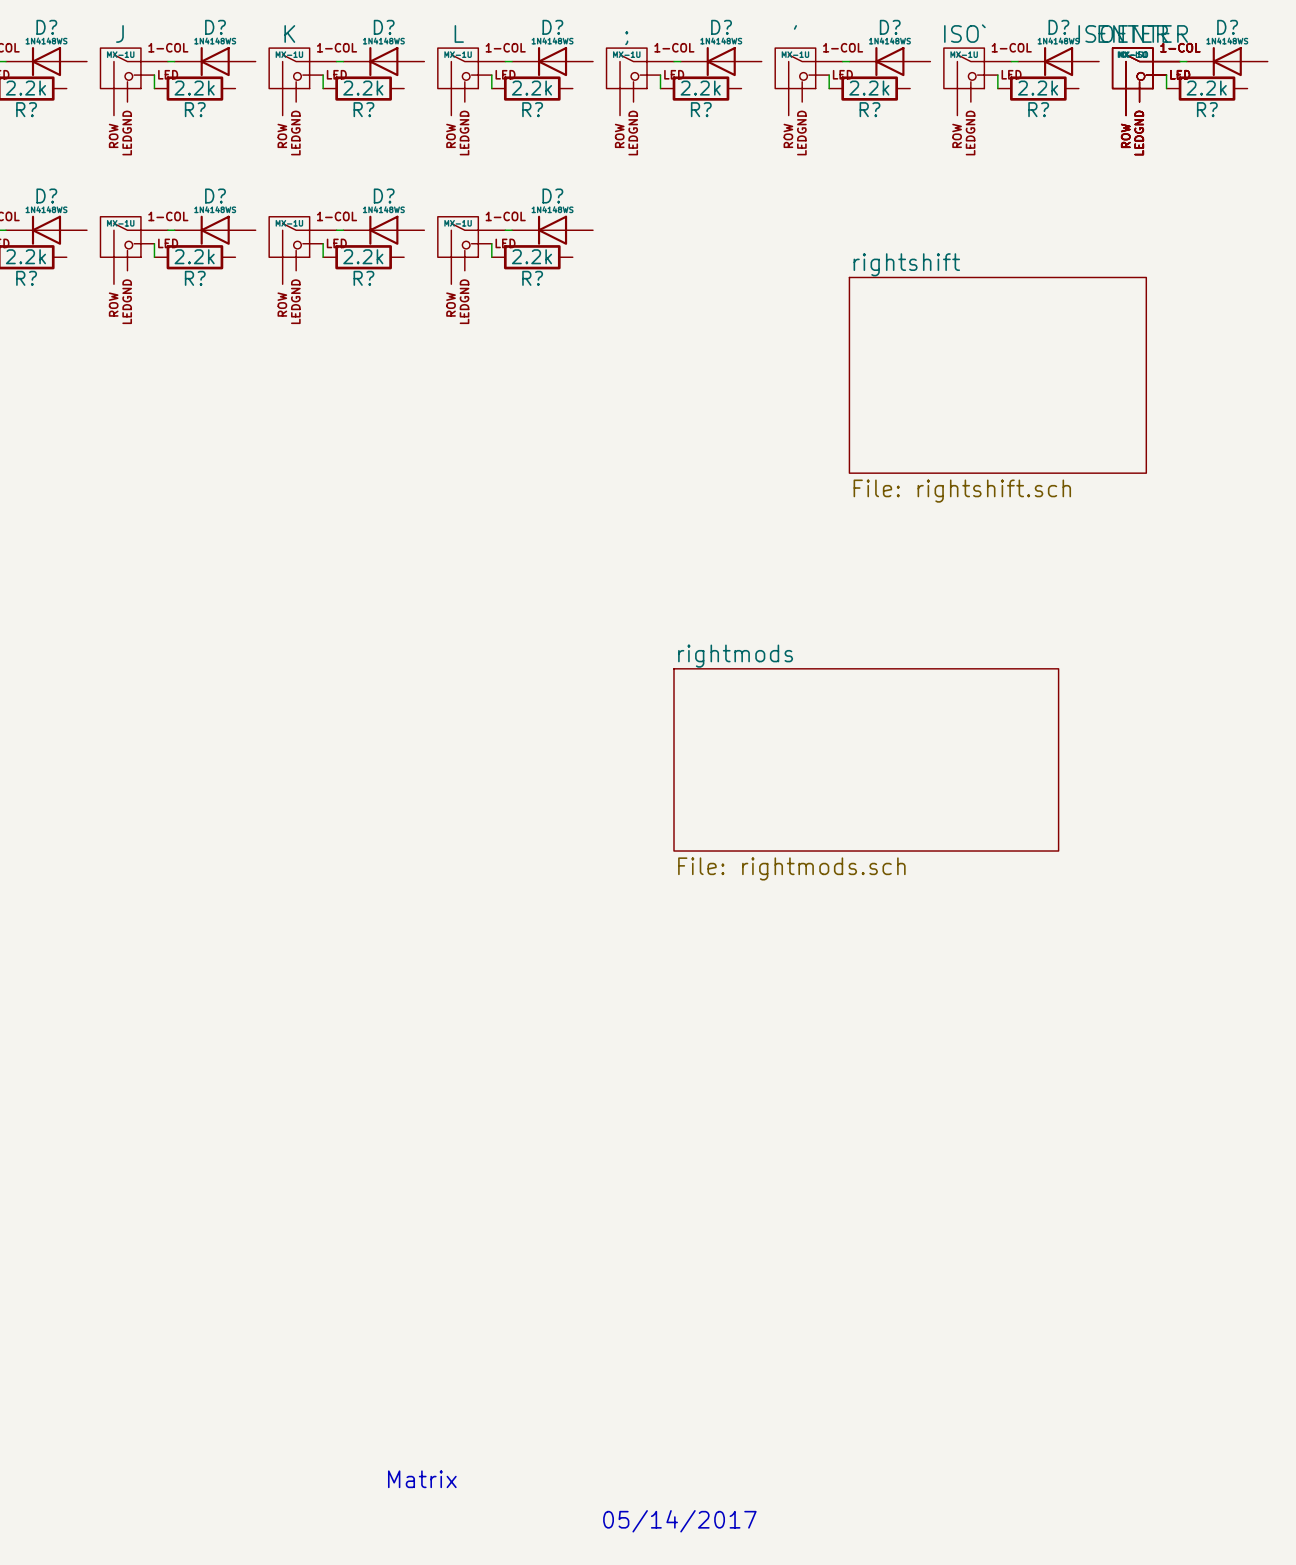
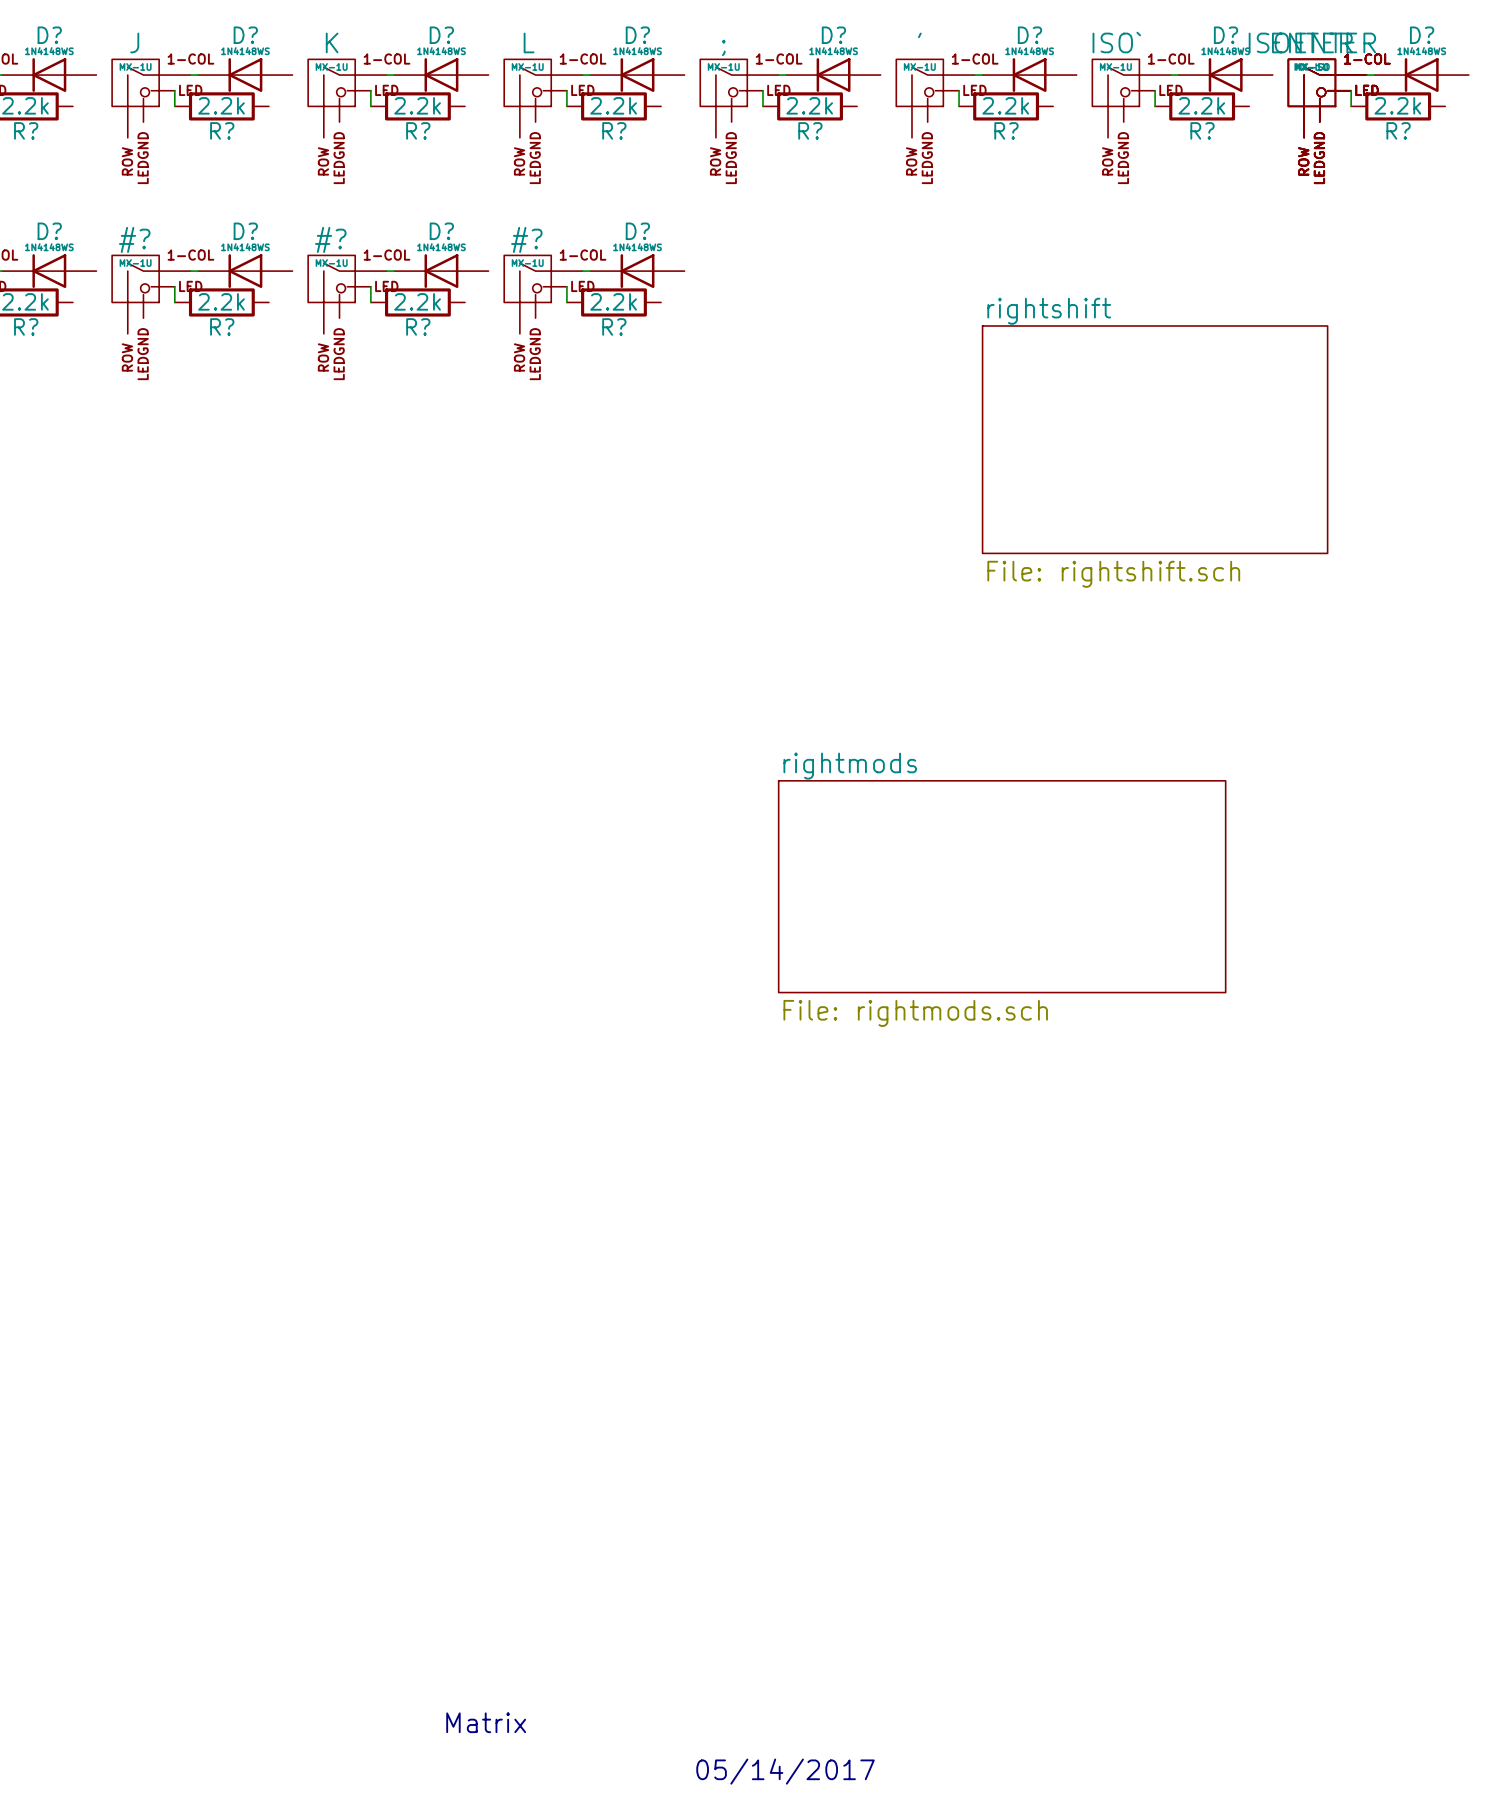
power symbol name: none -> #? (134, 239)
power symbol name: none -> #? (330, 239)
power symbol name: none -> #? (526, 239)

